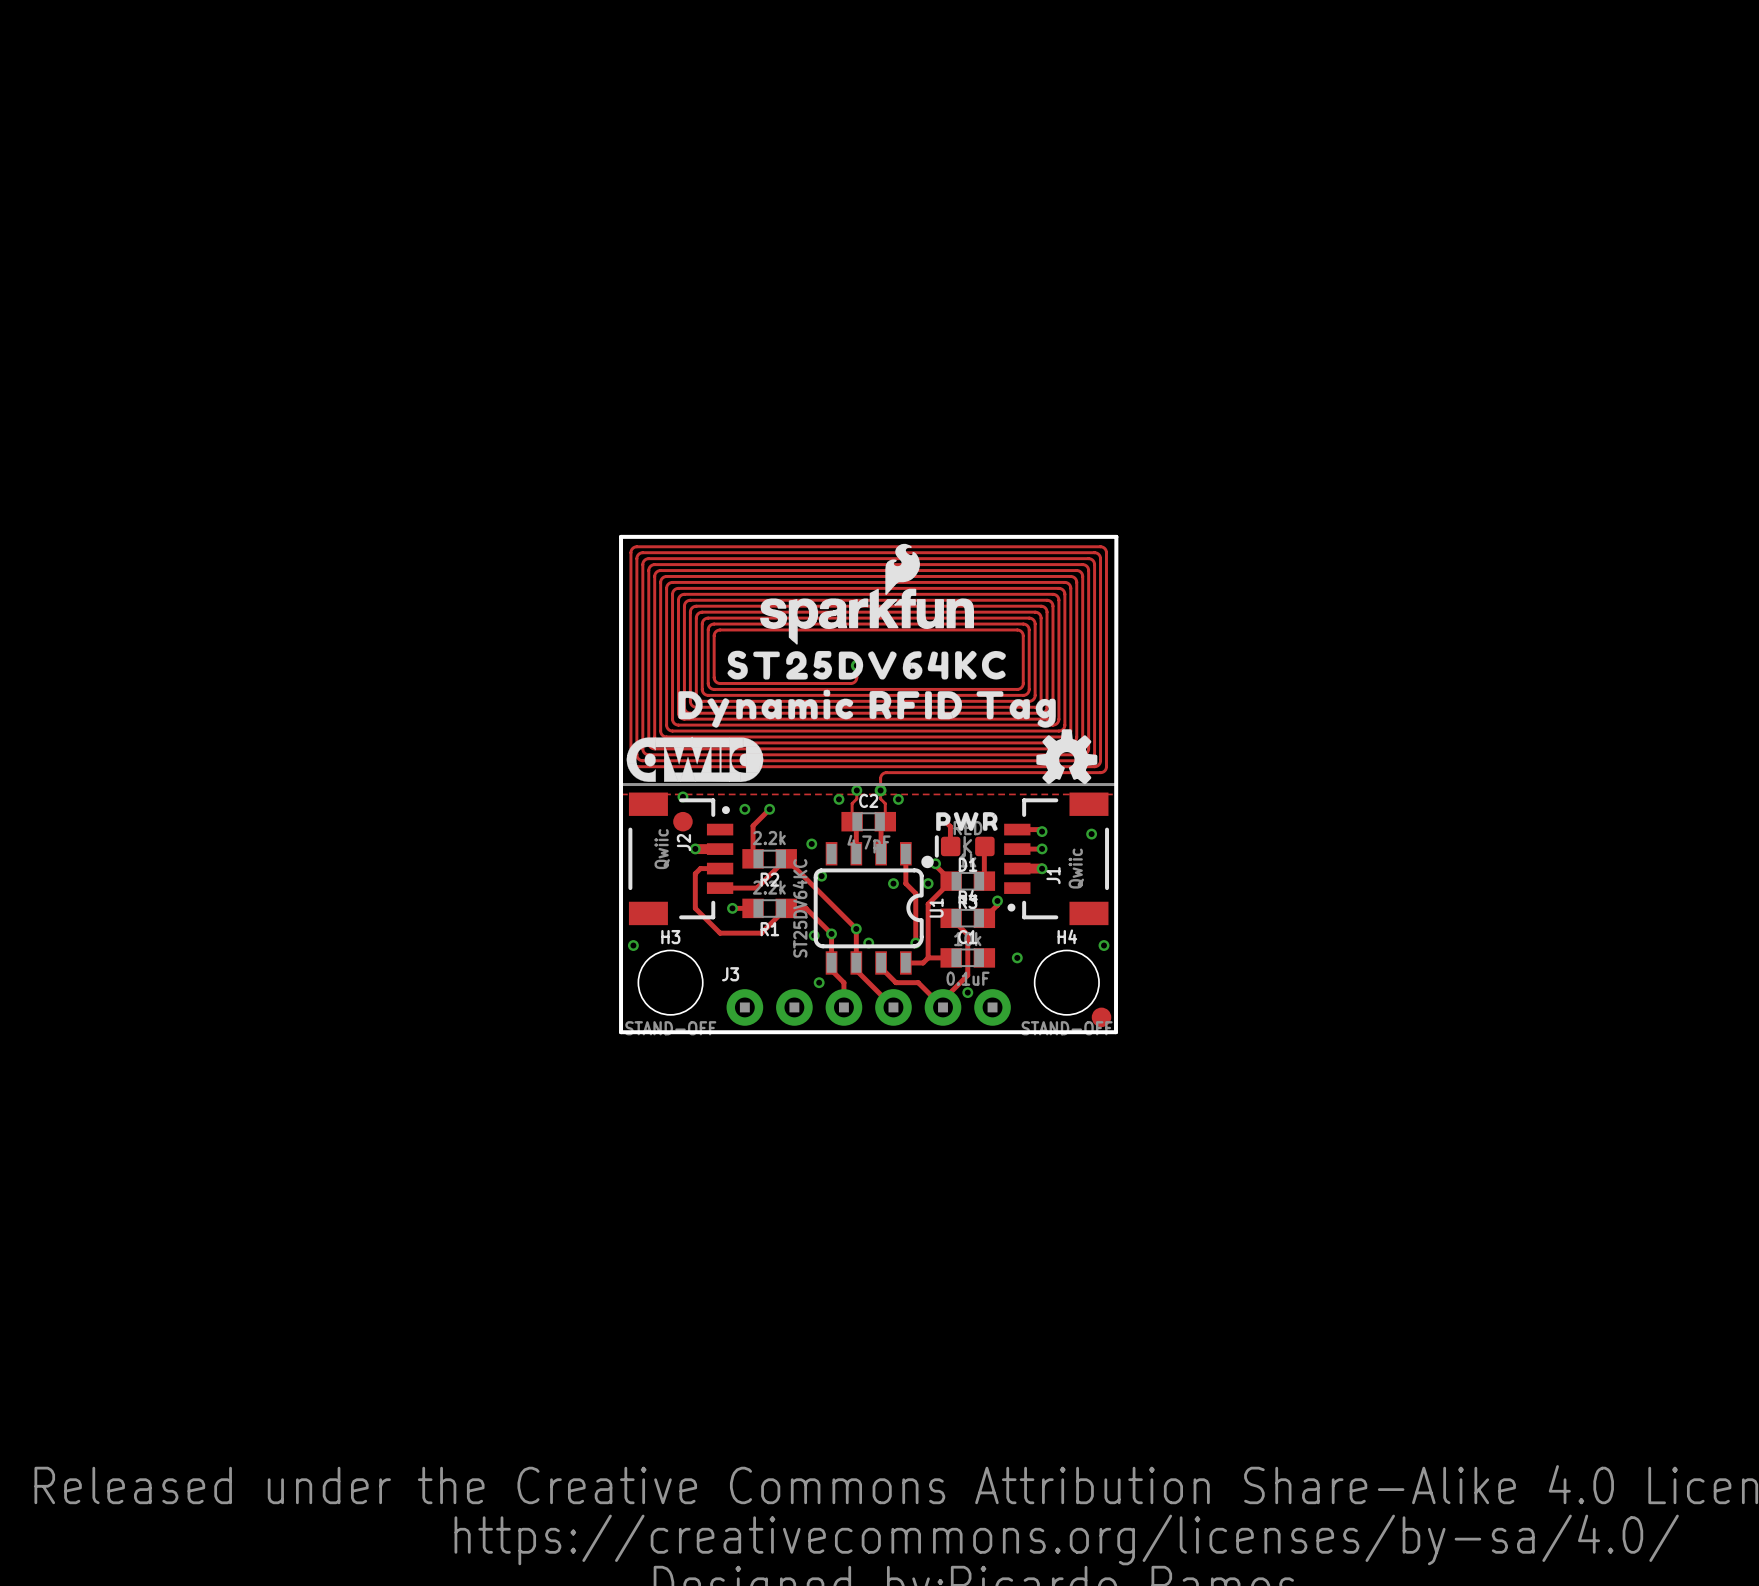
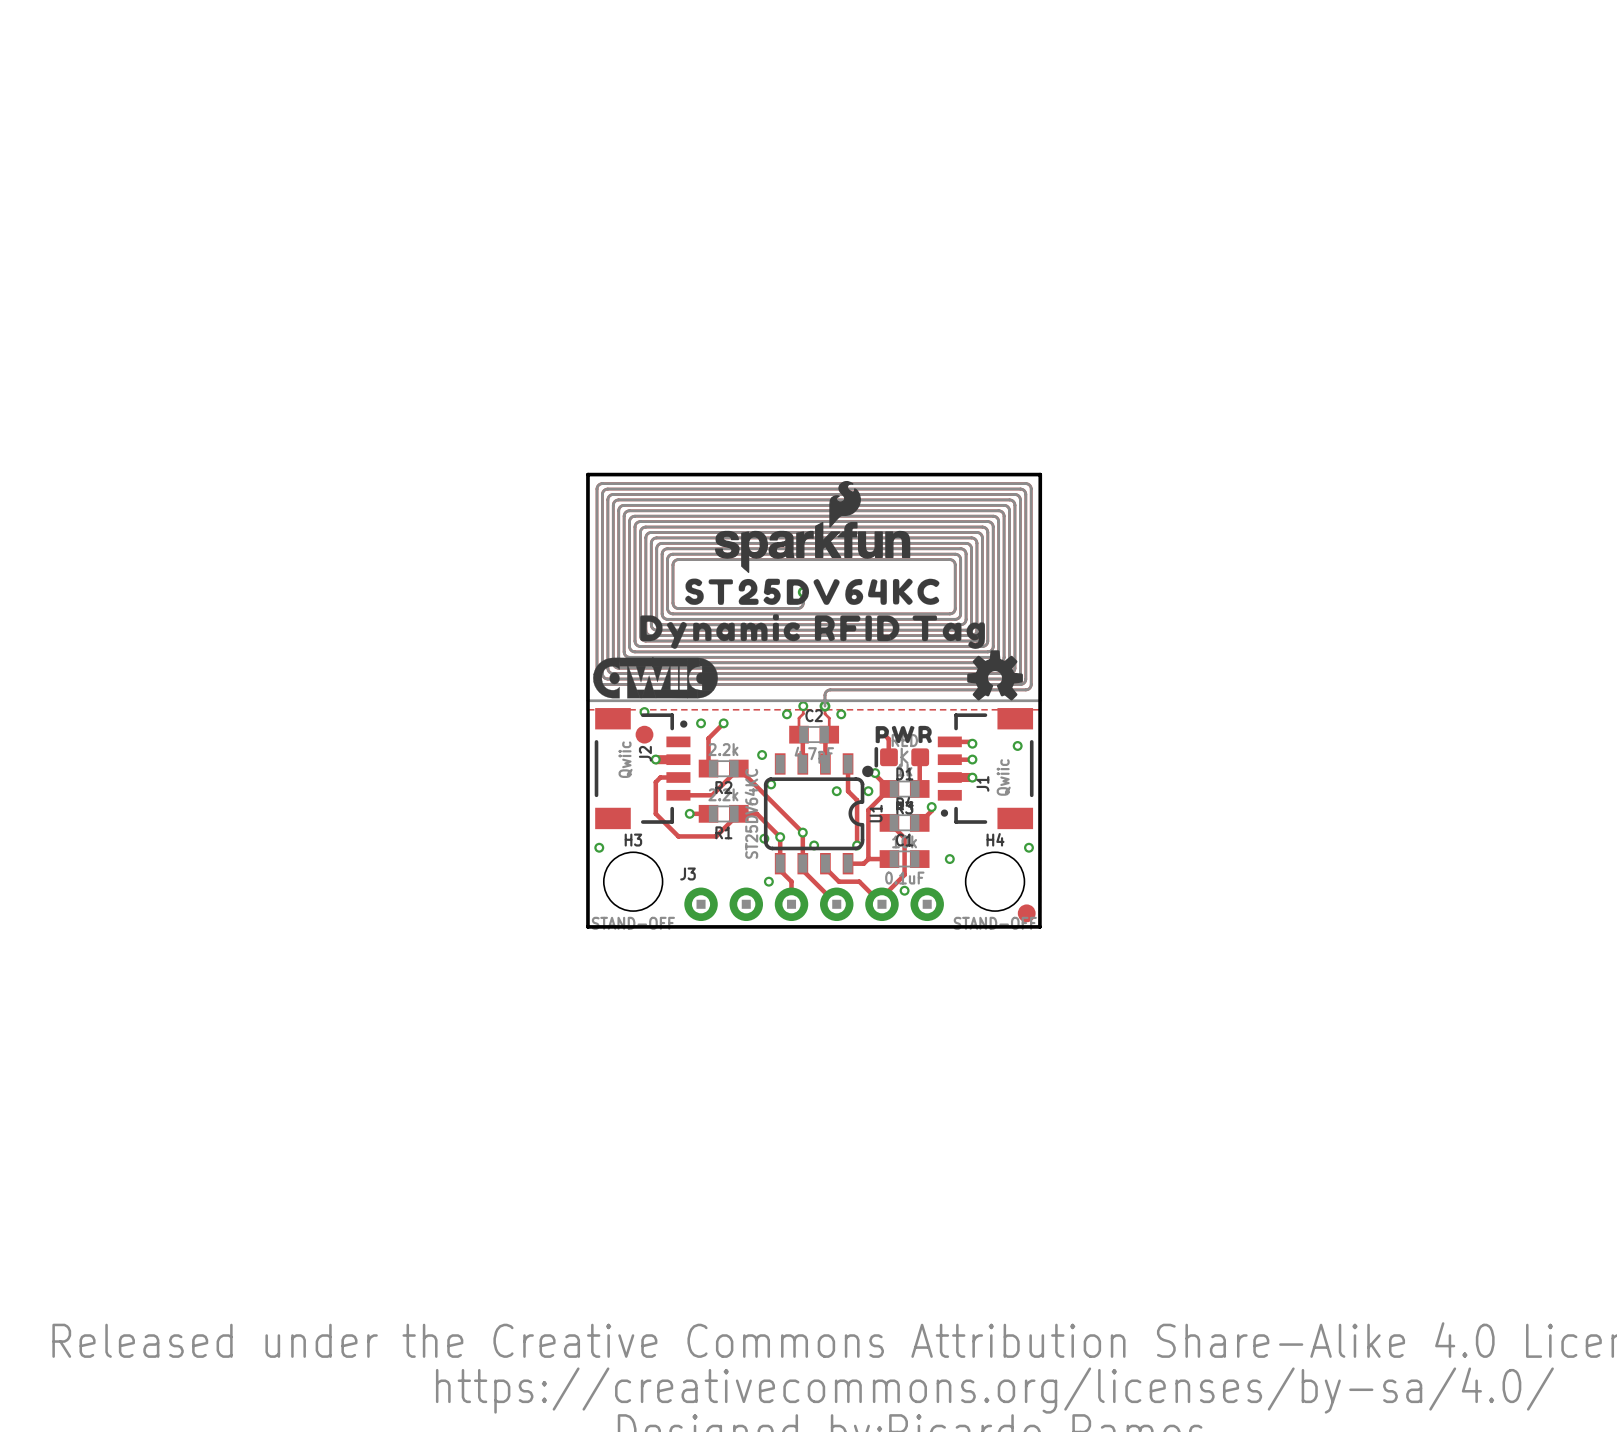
part footprint: [619, 535, 1118, 797] -> [586, 473, 1042, 712]

